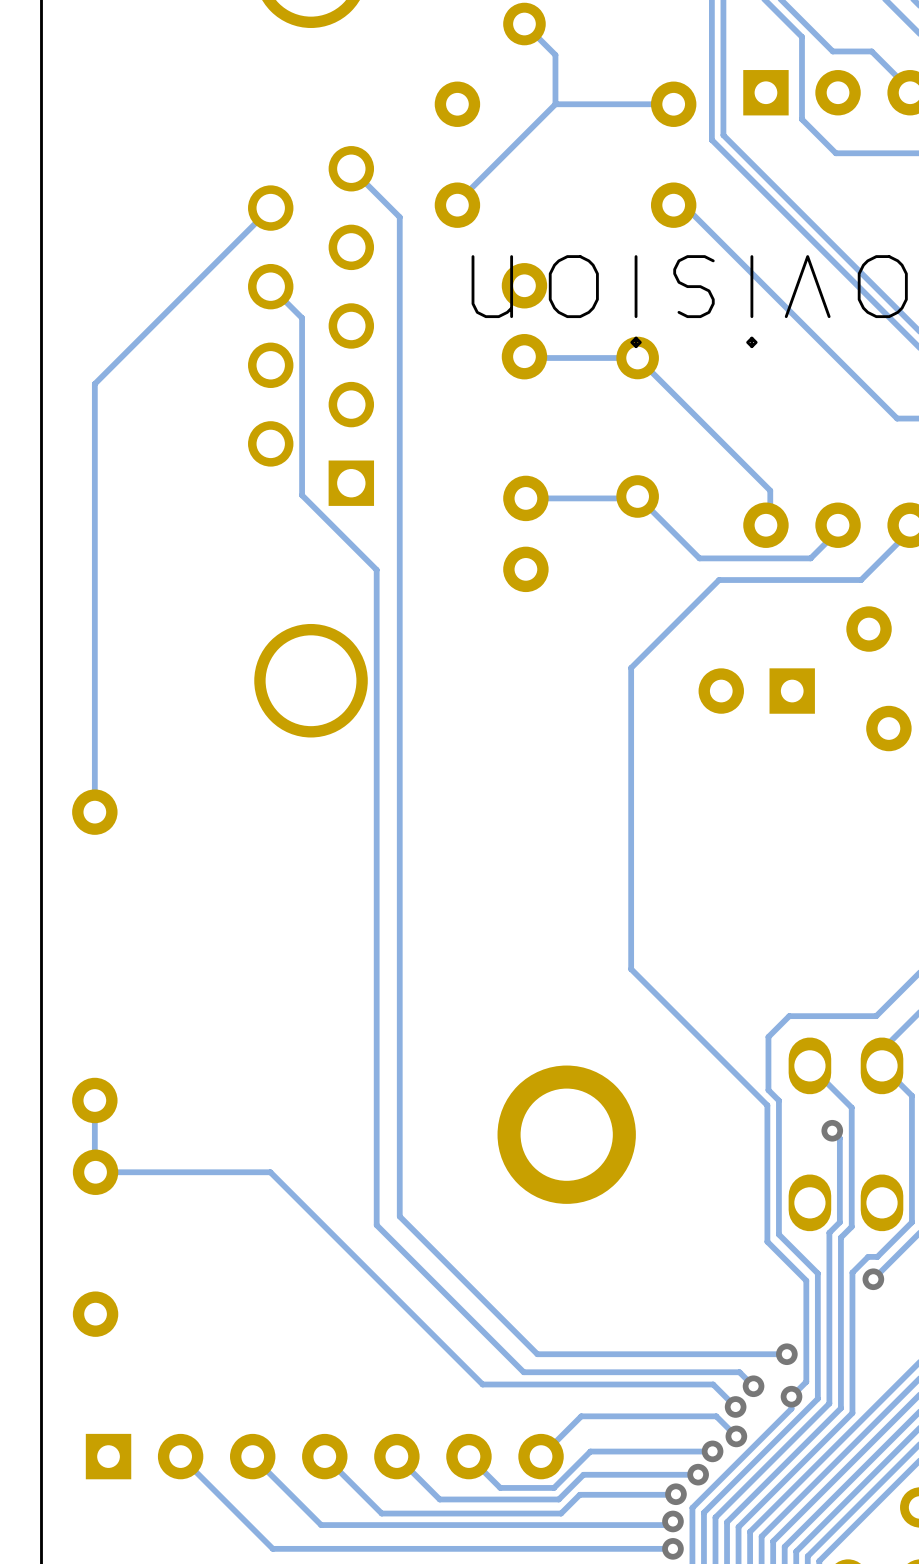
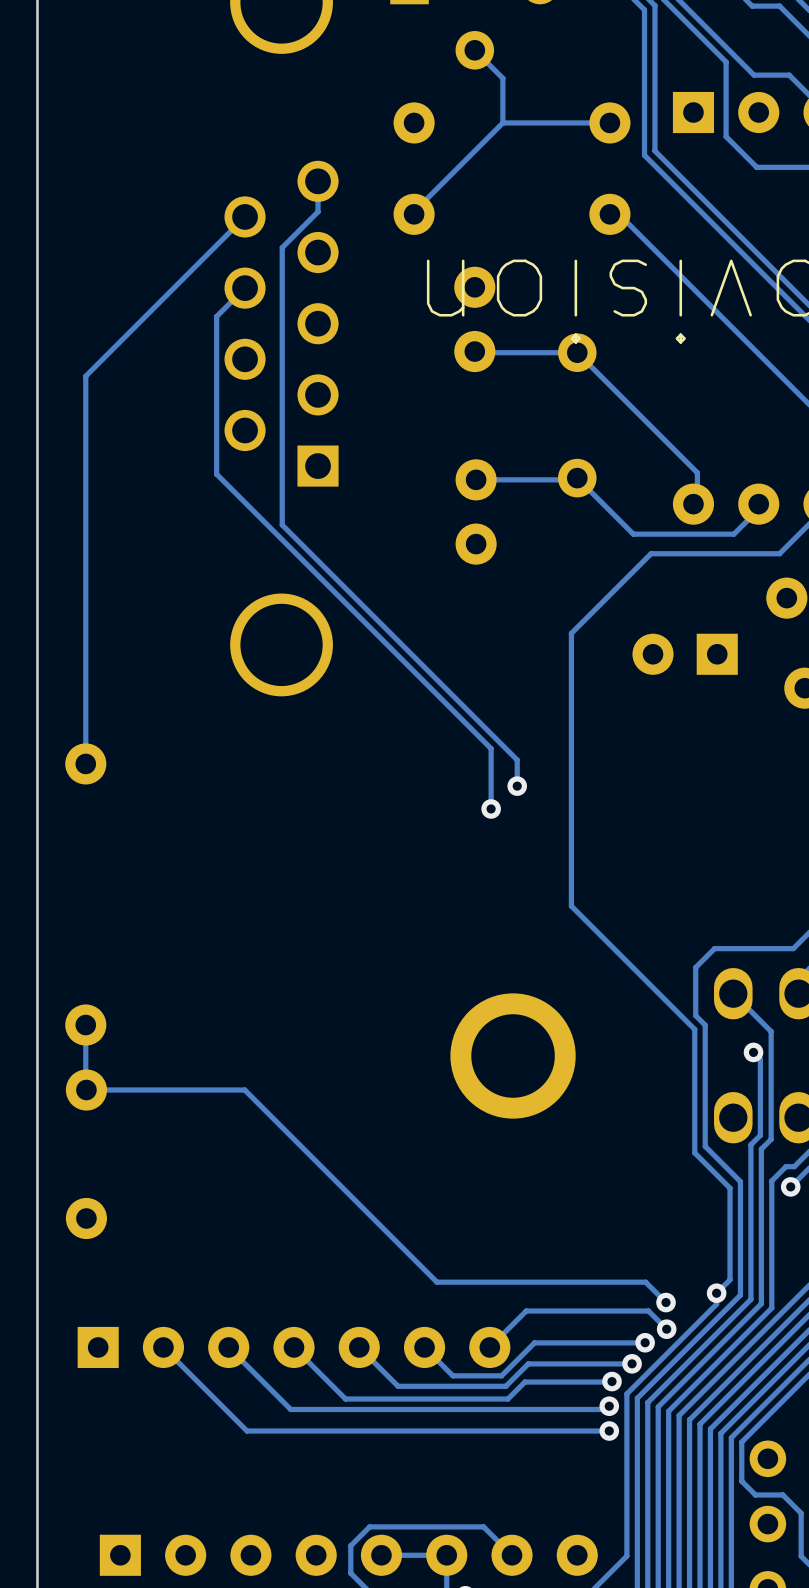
track: (351, 168) (399, 217) (399, 1216) (537, 1354) (786, 1354) -> (318, 181) (318, 211) (282, 247) (282, 525) (517, 760) (517, 786)
track: (270, 286) (302, 318) (302, 495) (376, 569) (376, 1225) (523, 1372) (739, 1372) (753, 1386) -> (245, 288) (216, 316) (216, 474) (491, 748) (491, 808)
via: none -> (517, 786)
via: none -> (491, 808)
via: (786, 1354) -> none
via: (753, 1386) -> none

